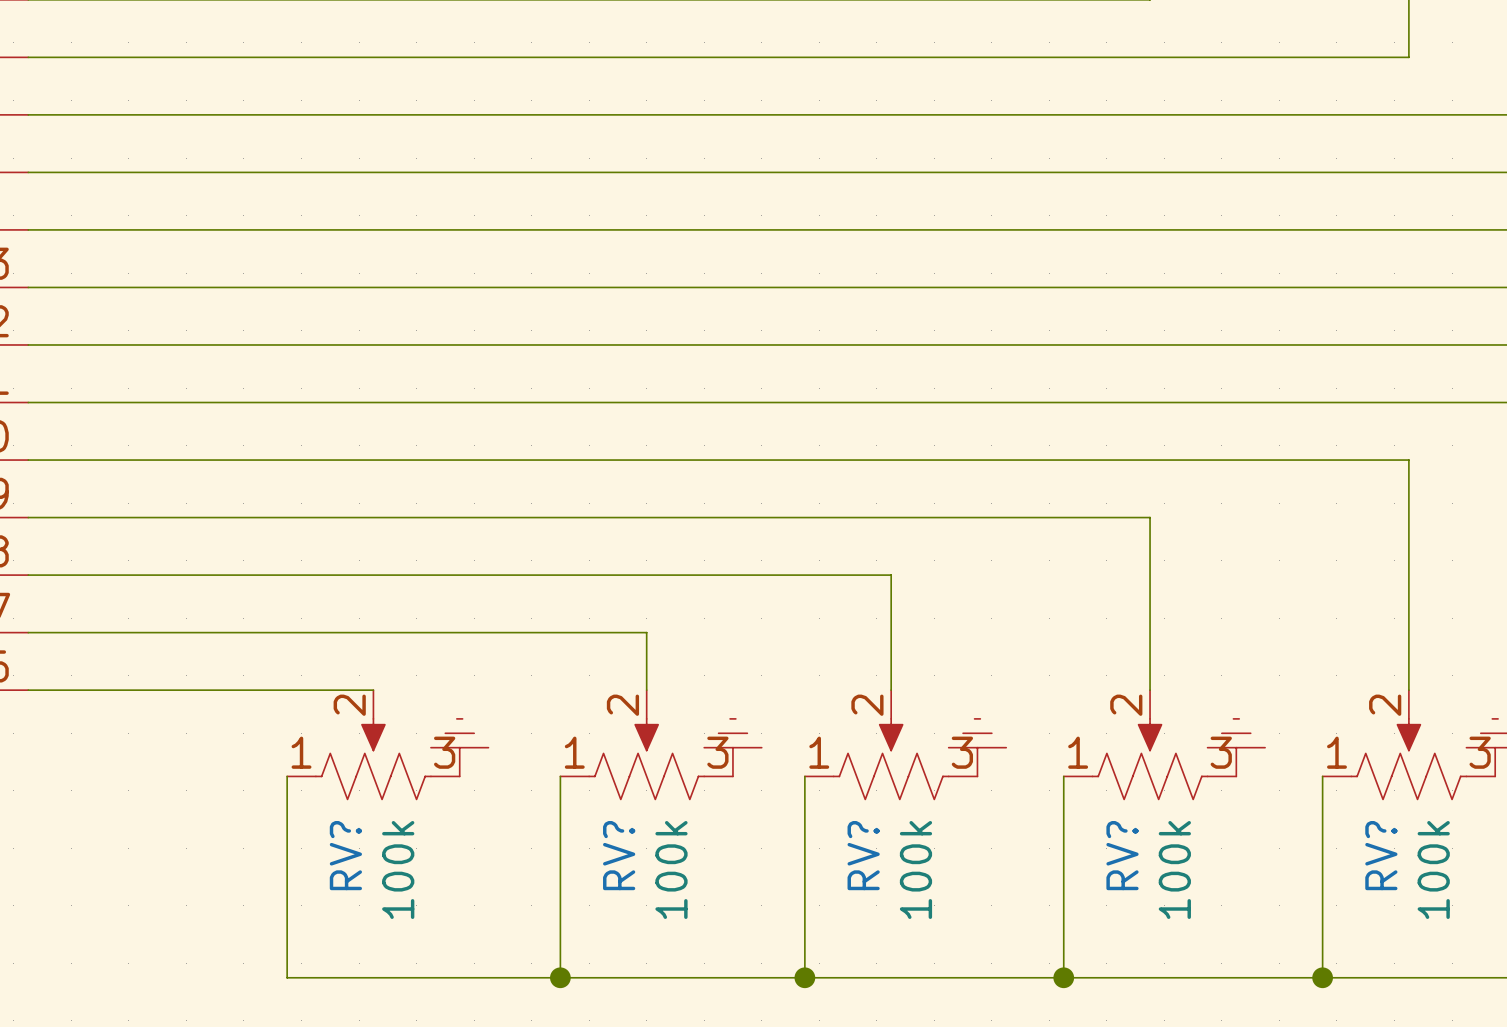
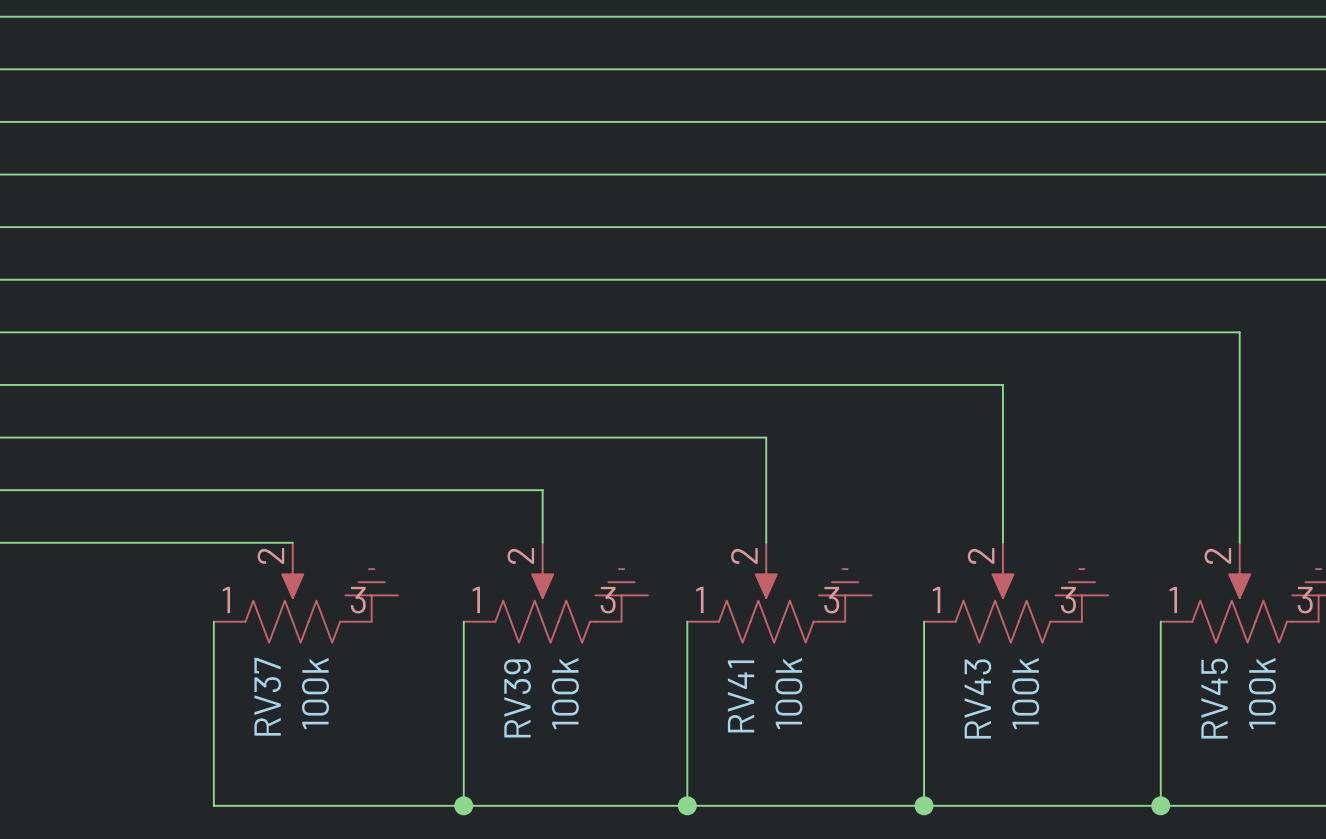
RV? name: RV? (345, 855) -> RV37 (267, 696)
RV? name: RV? (619, 855) -> RV39 (517, 698)
RV? name: RV? (863, 855) -> RV41 (741, 696)
RV? name: RV? (1122, 855) -> RV43 (977, 698)
RV? name: RV? (1381, 855) -> RV45 (1214, 698)

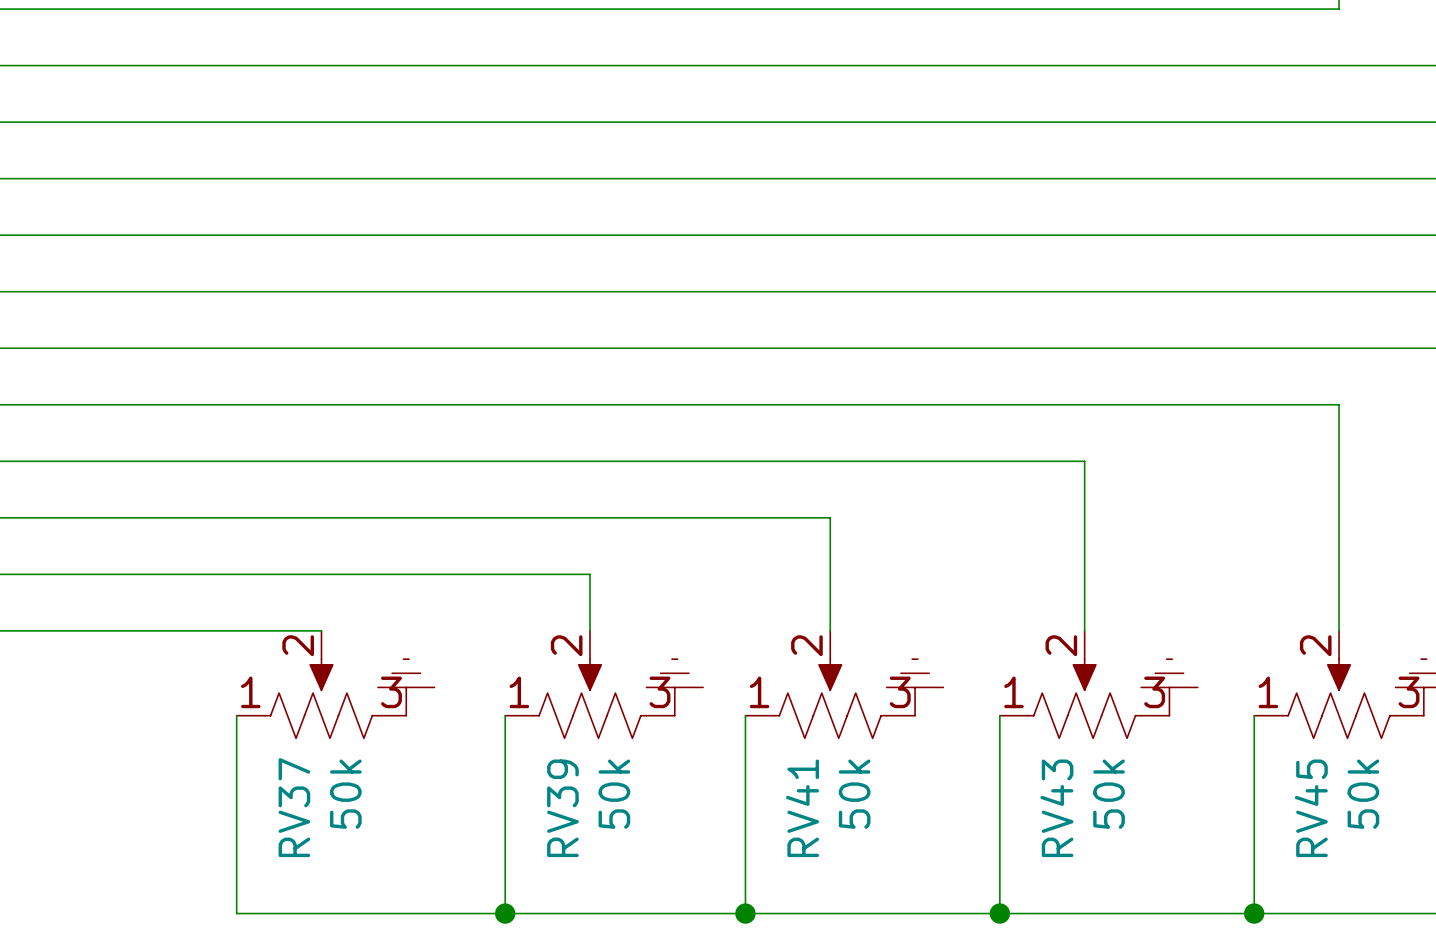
RV37 value: 100k (315, 693) -> 50k (345, 794)
RV39 value: 100k (565, 693) -> 50k (614, 794)
RV41 value: 100k (788, 693) -> 50k (854, 794)
RV43 value: 100k (1025, 693) -> 50k (1109, 794)
RV45 value: 100k (1262, 693) -> 50k (1363, 794)

